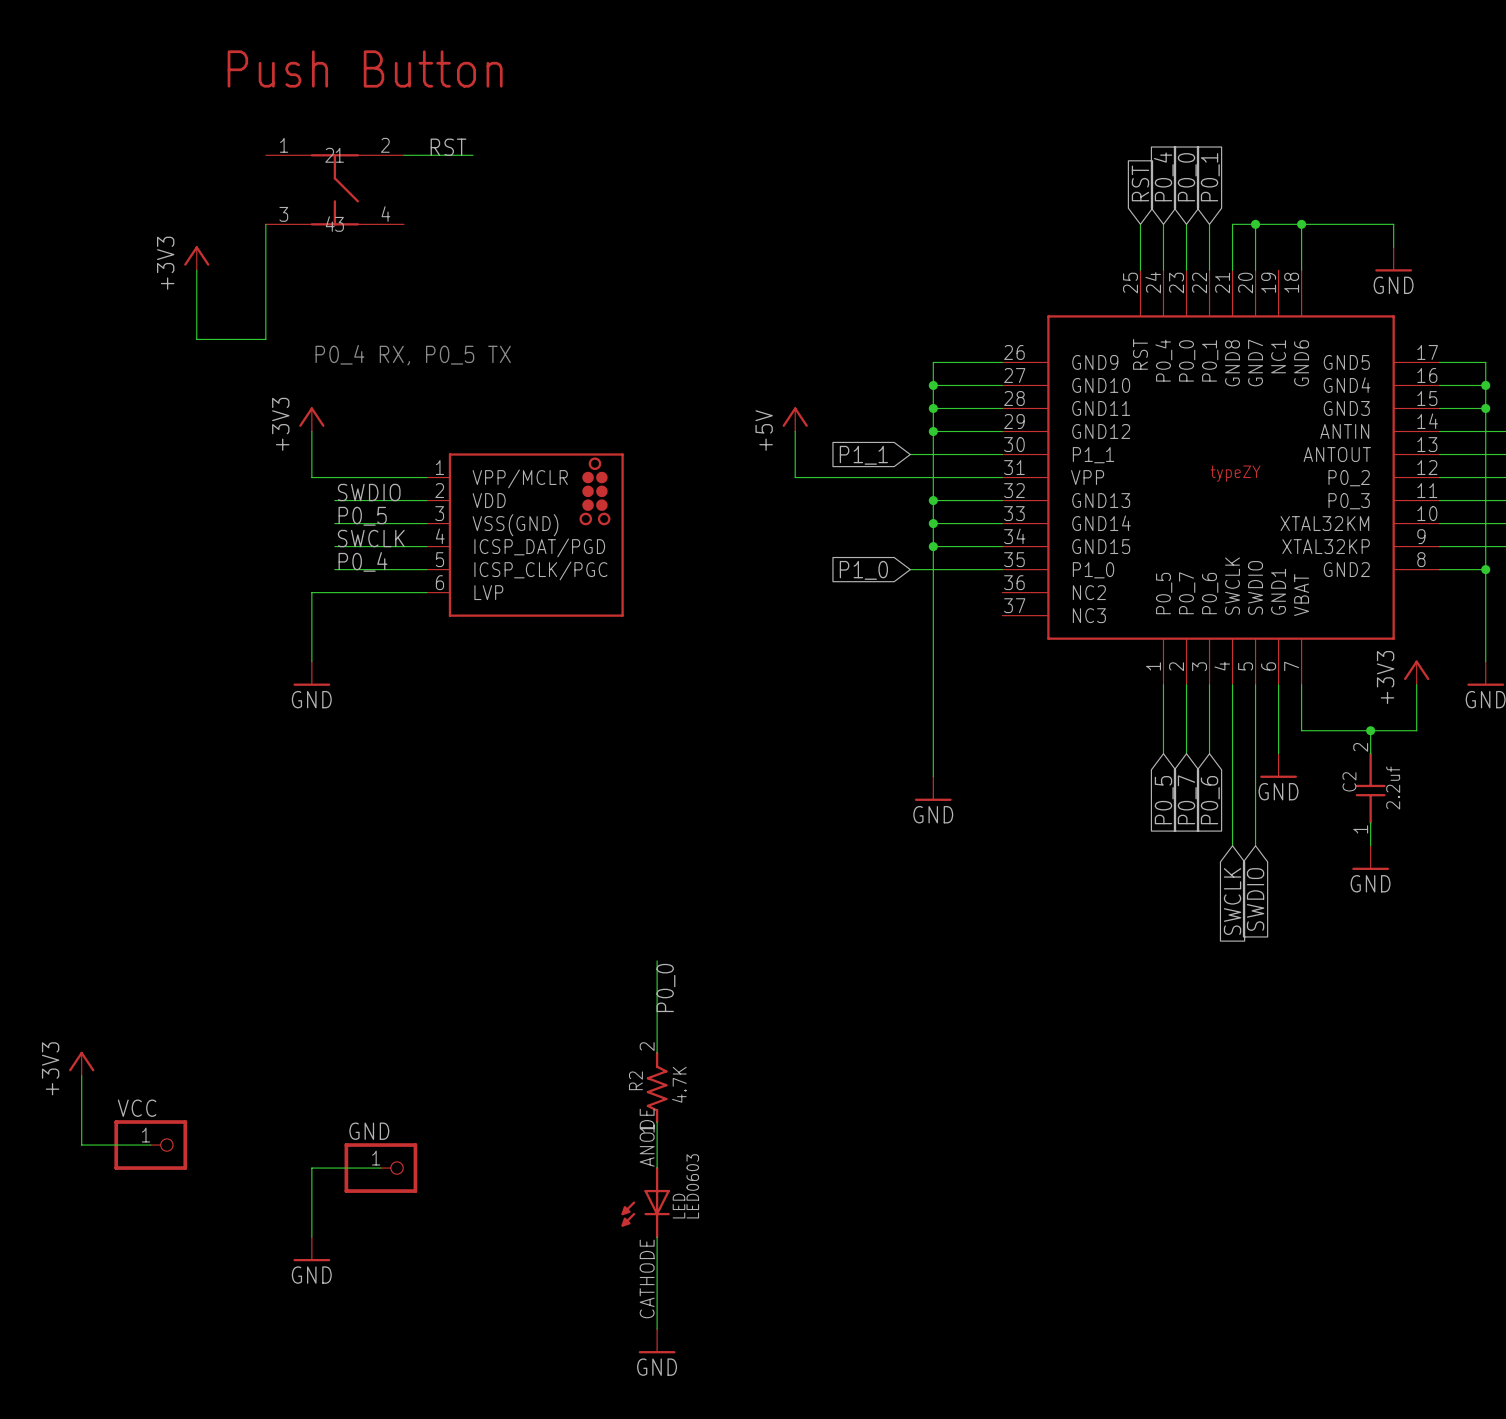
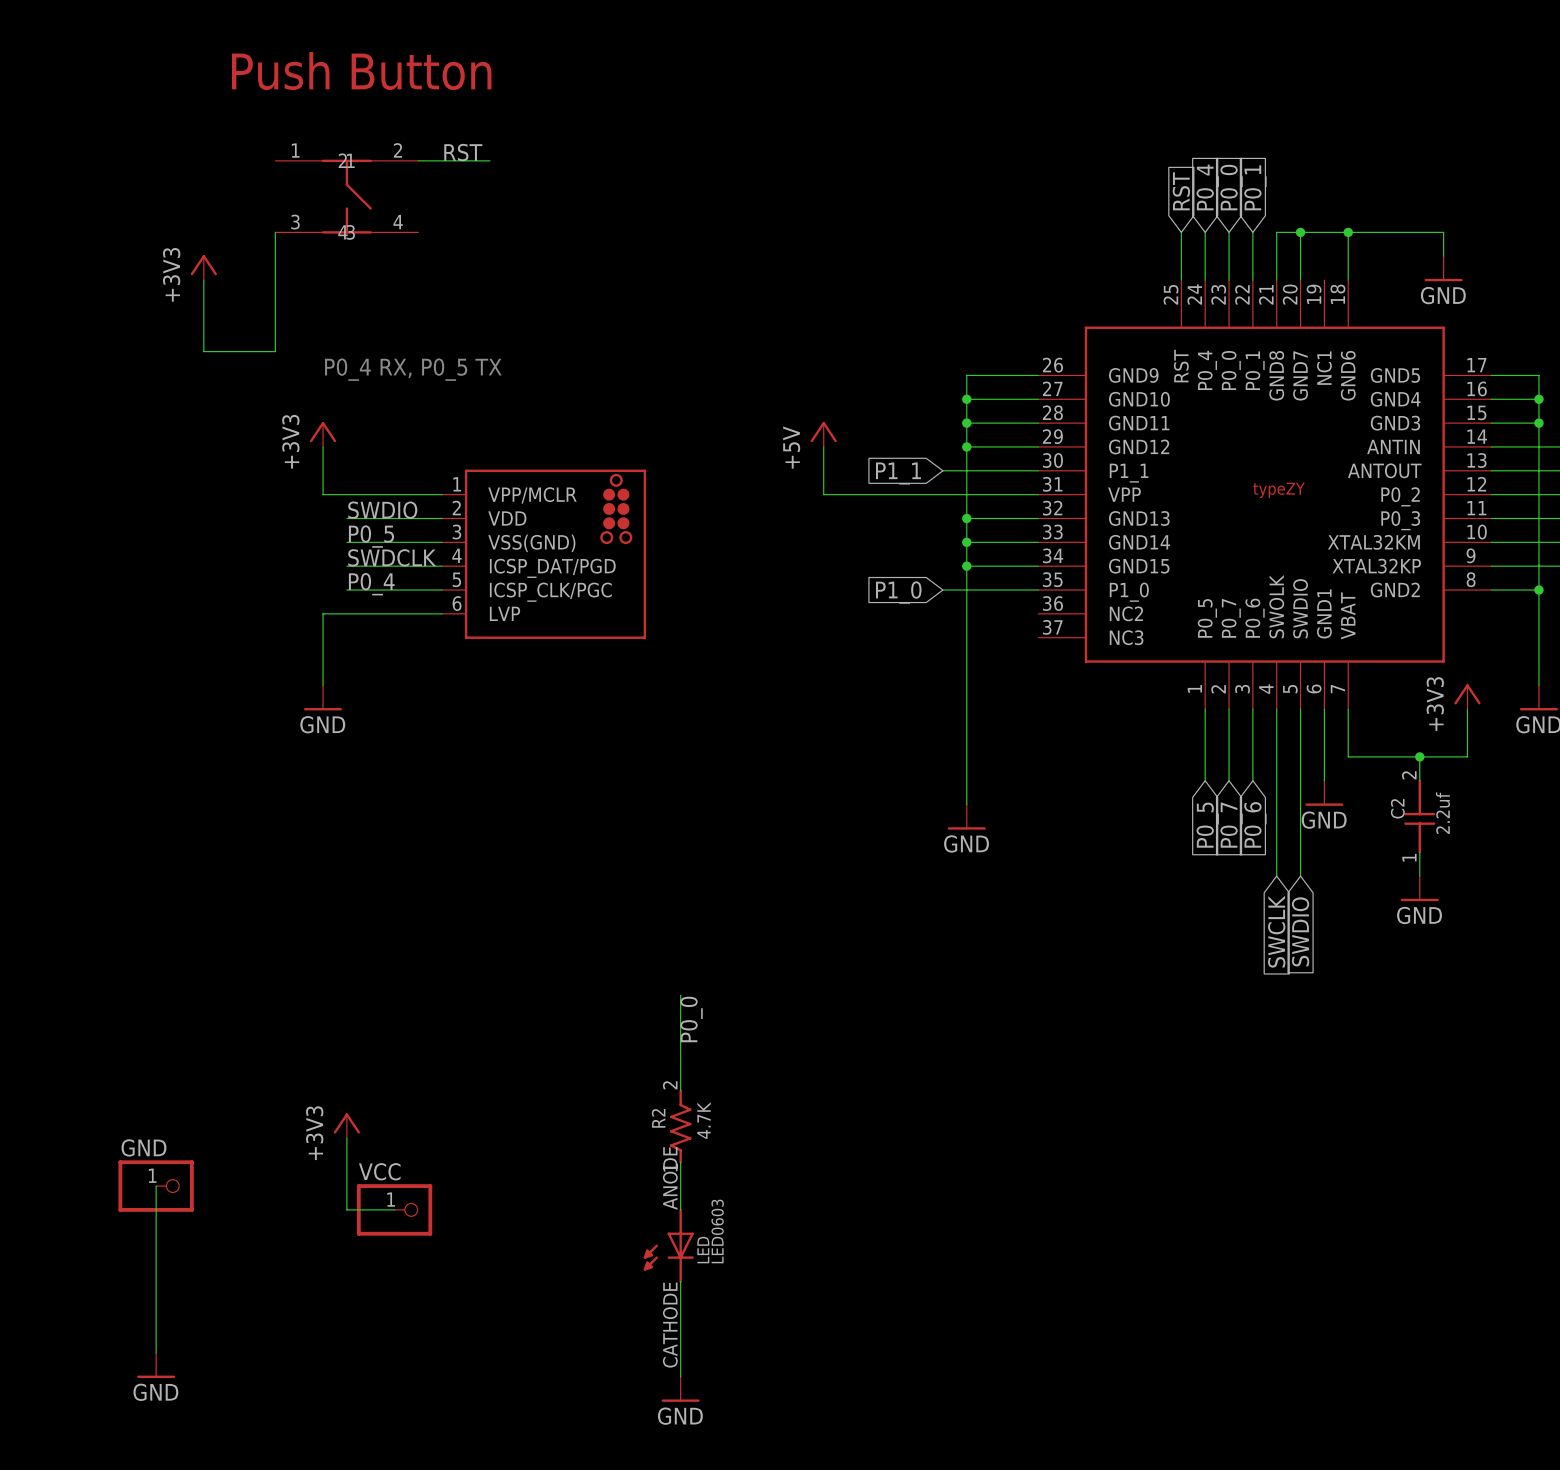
label: SWCLK (371, 538) -> SWDCLK (392, 557)
part pin name: SWCLK (1232, 586) -> SWOLK (1276, 606)
power symbol: +3V3 (81, 1063) -> none
wire: (81, 1075) (81, 1145) (150, 1145) -> (156, 1352) (156, 1186)
power symbol: none -> +3V3 (346, 1125)
VCC name: VCC (137, 1108) -> GND (143, 1147)
GND name: GND (369, 1131) -> VCC (379, 1171)
wire: (334, 1168) (311, 1168) (311, 1237) -> (346, 1209) (346, 1138)
power symbol position: GND (311, 1249) -> GND (156, 1365)

